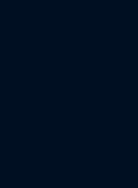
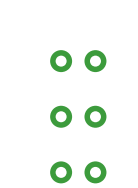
part: none -> (78, 61)
part: none -> (78, 116)
part: none -> (78, 172)

